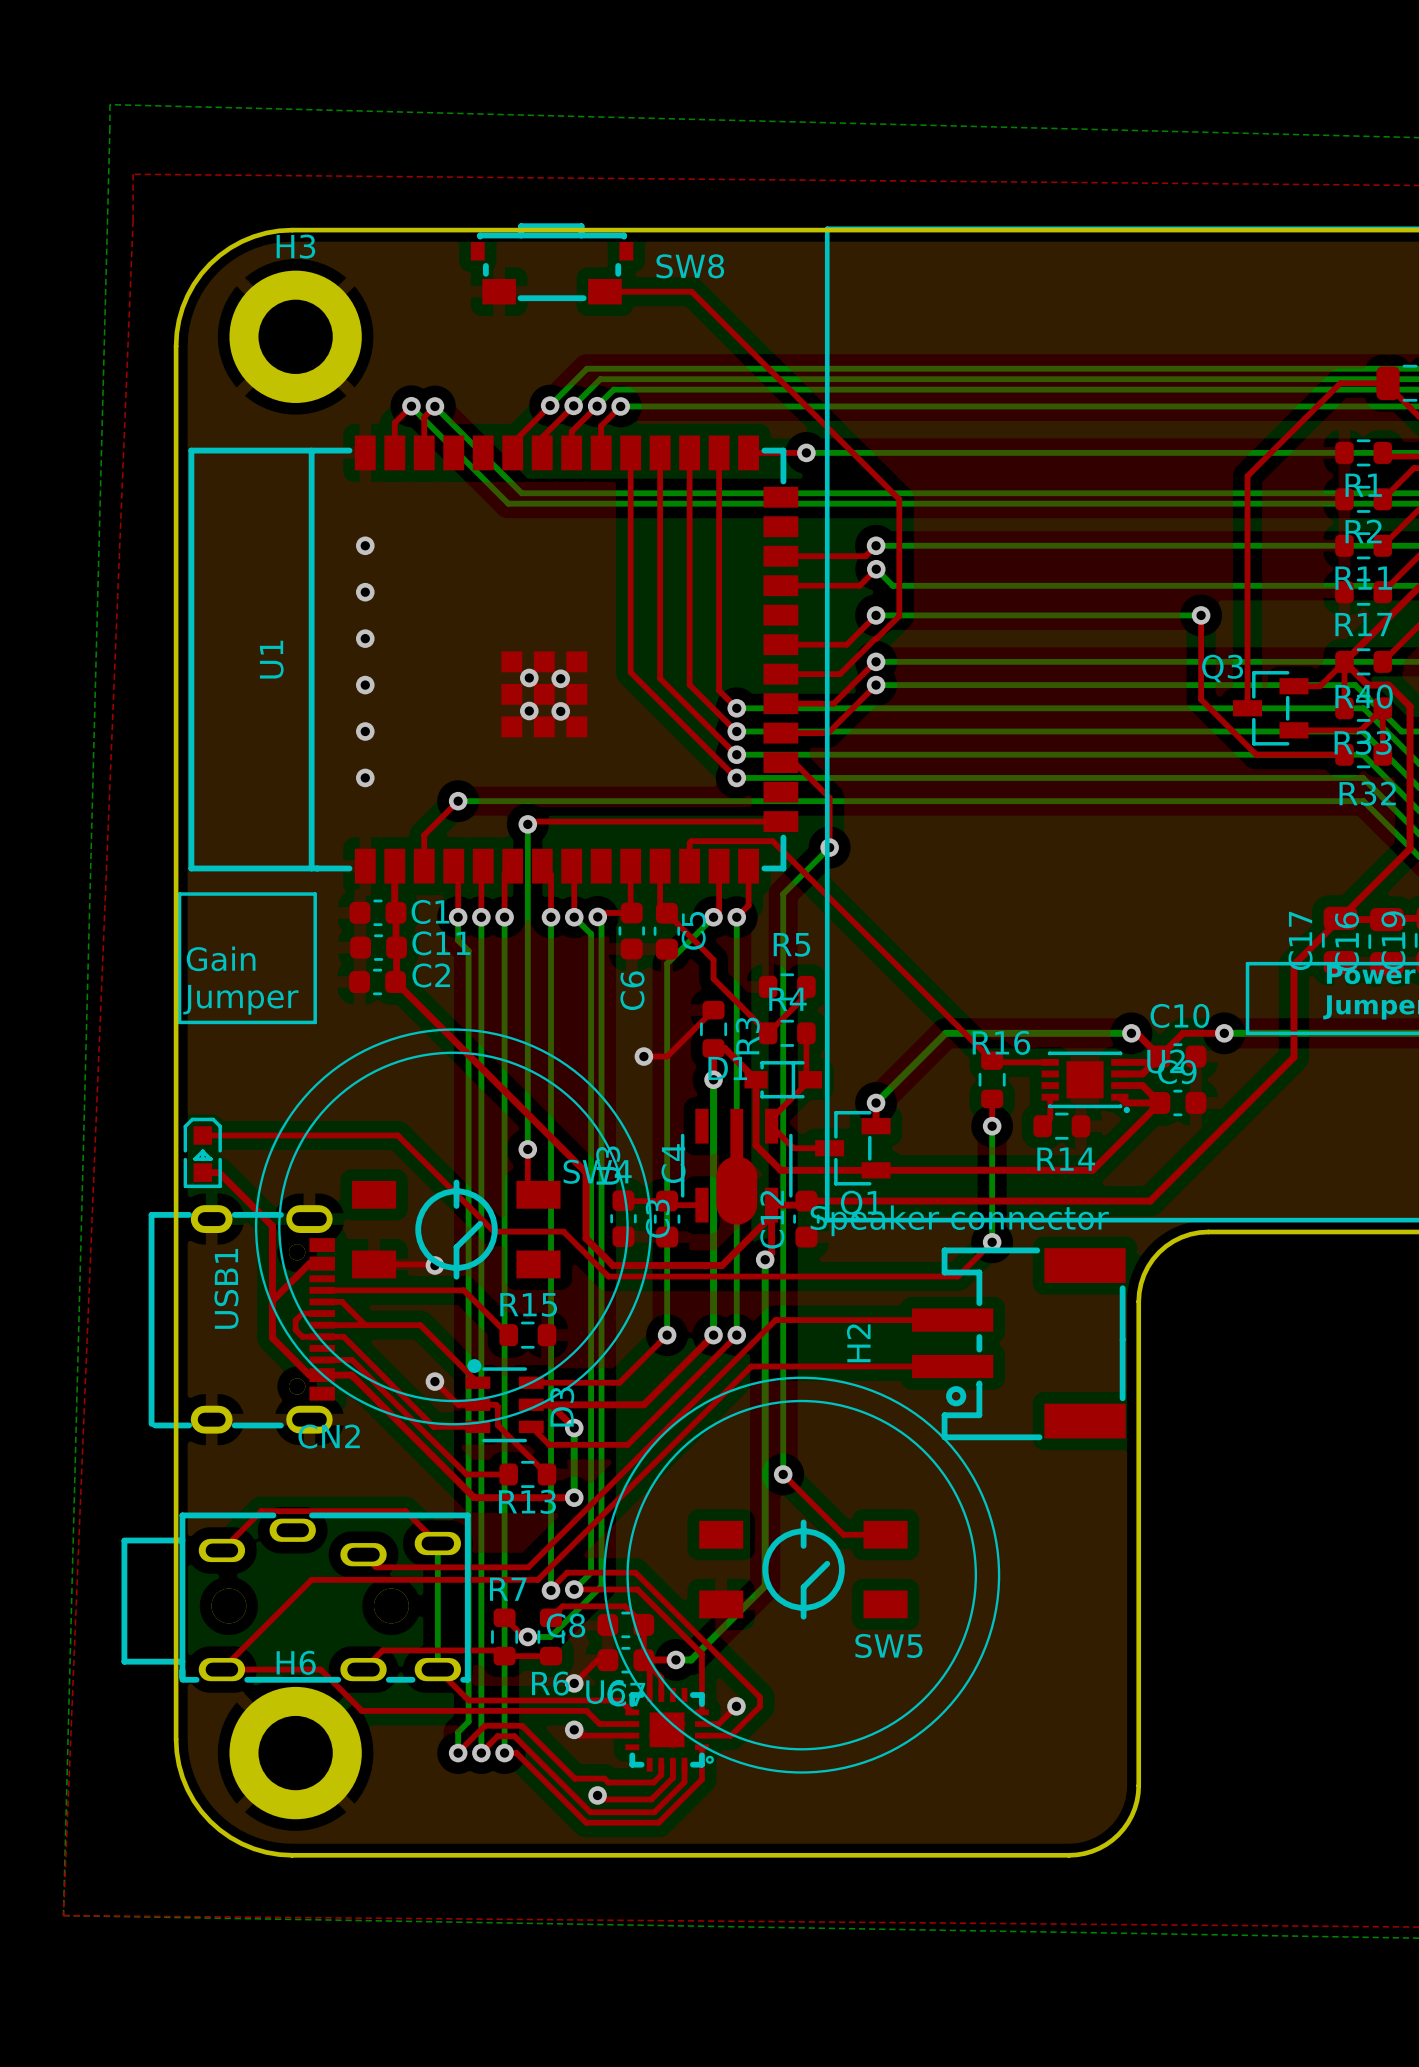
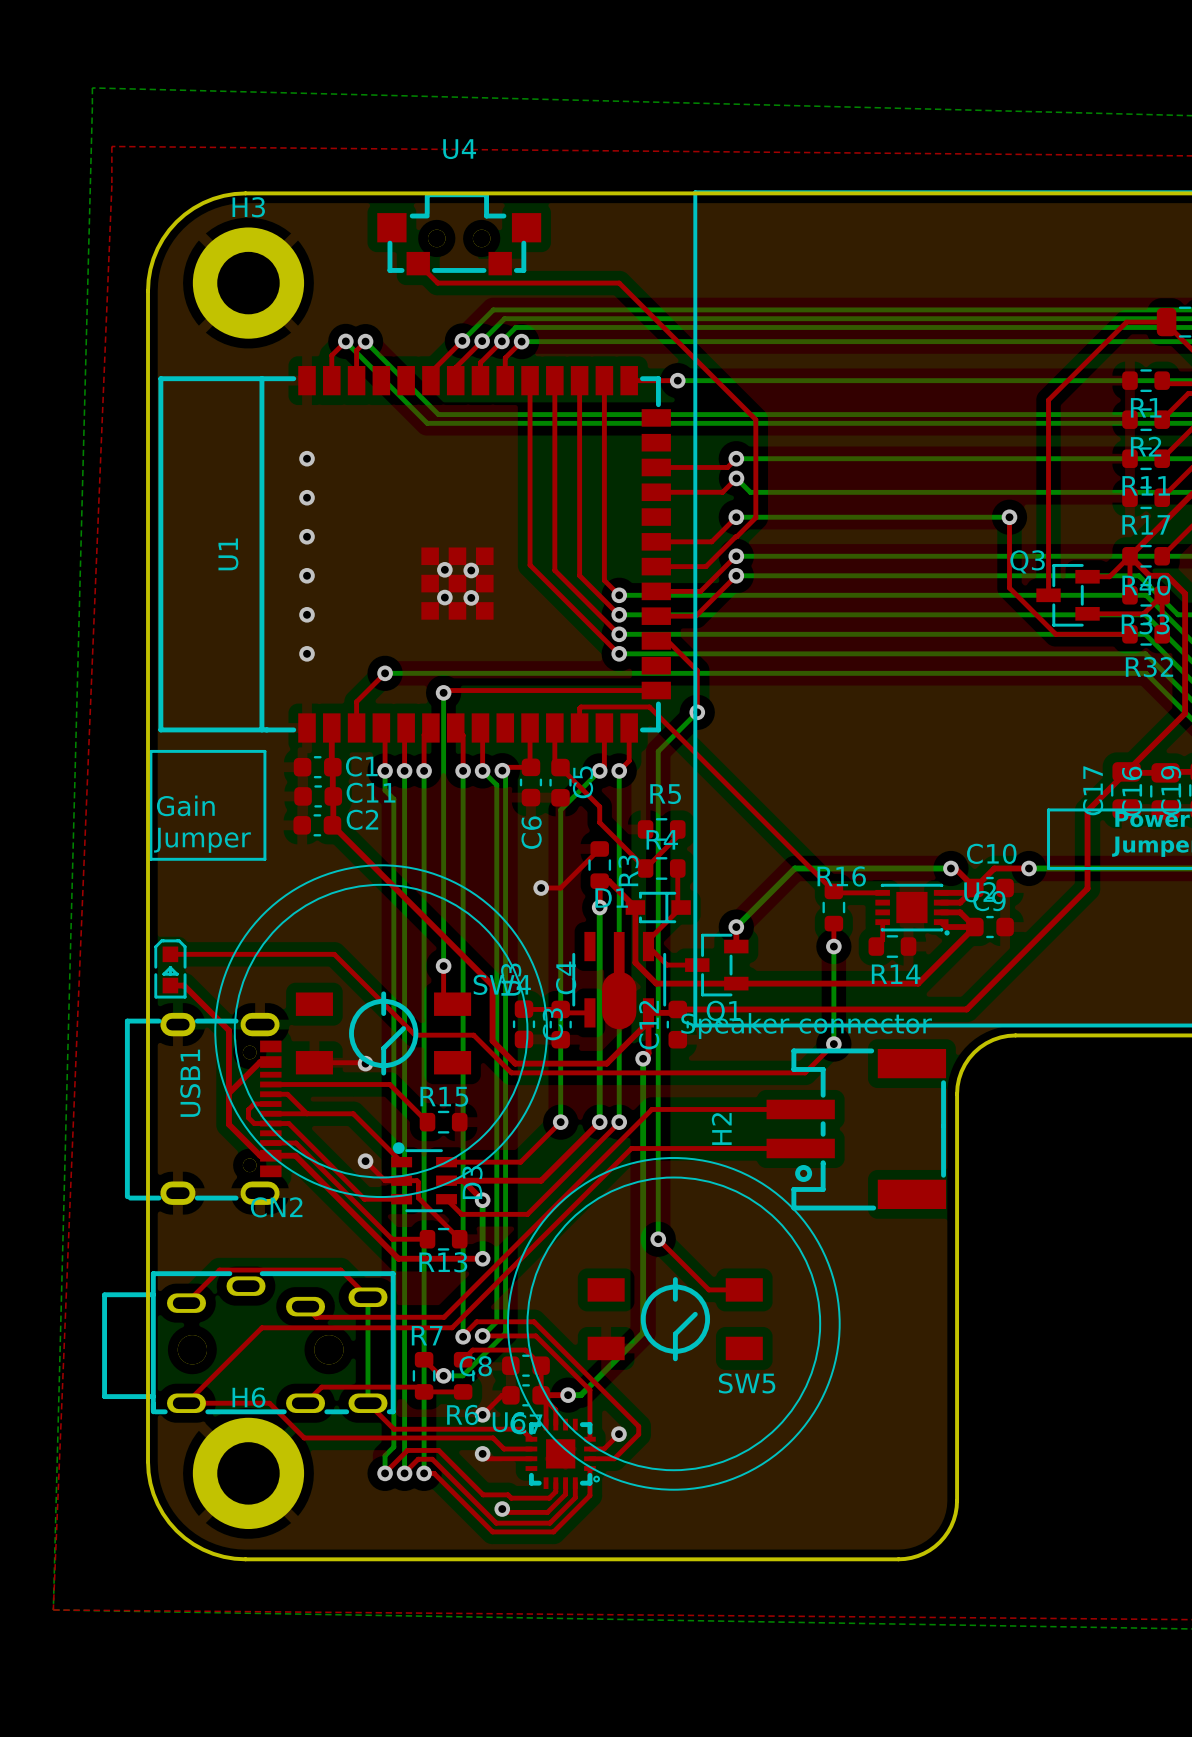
SW8: (552, 263) -> none
U4: none -> (459, 233)
top track: (605, 291) (691, 291) (736, 336) -> (418, 263) (437, 283) (619, 283)

